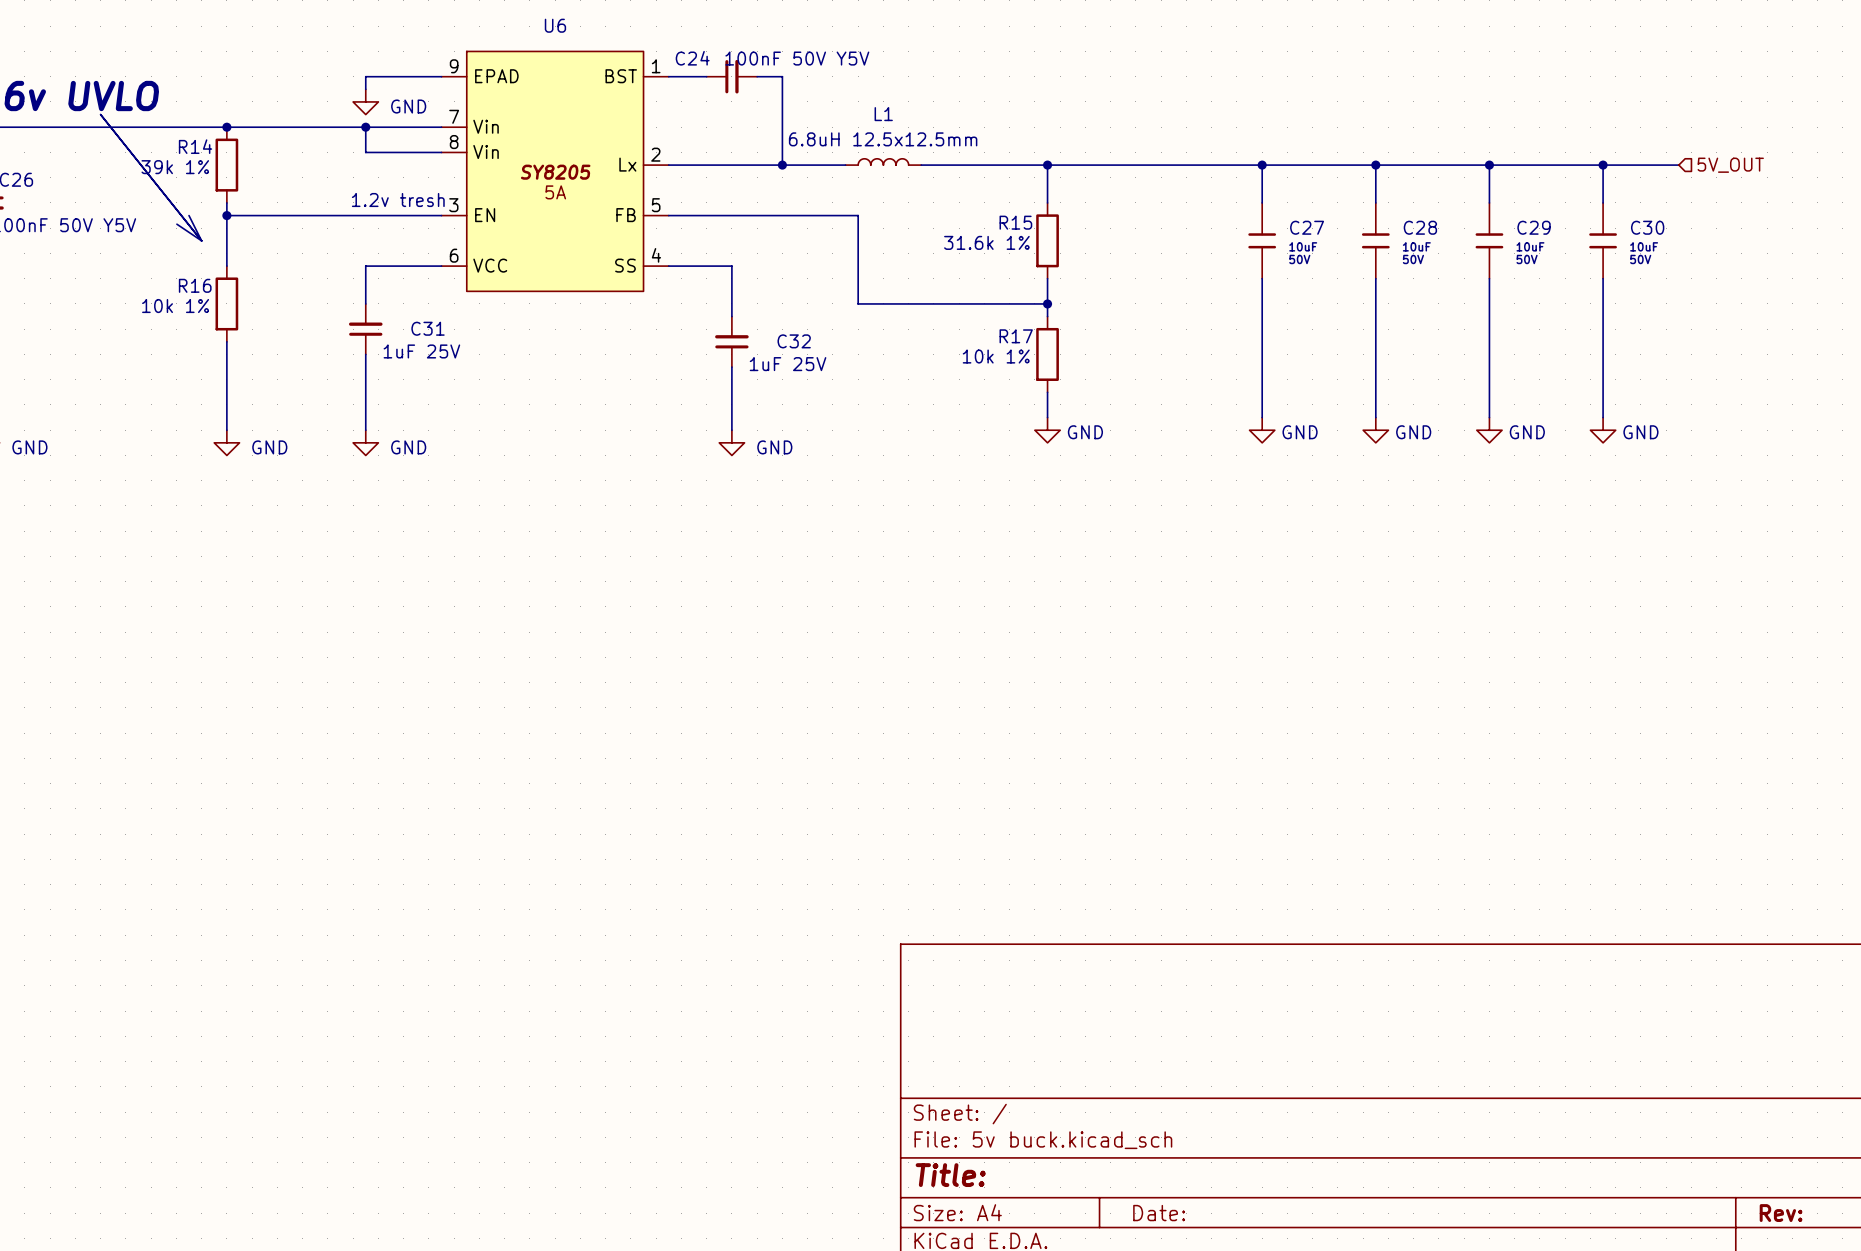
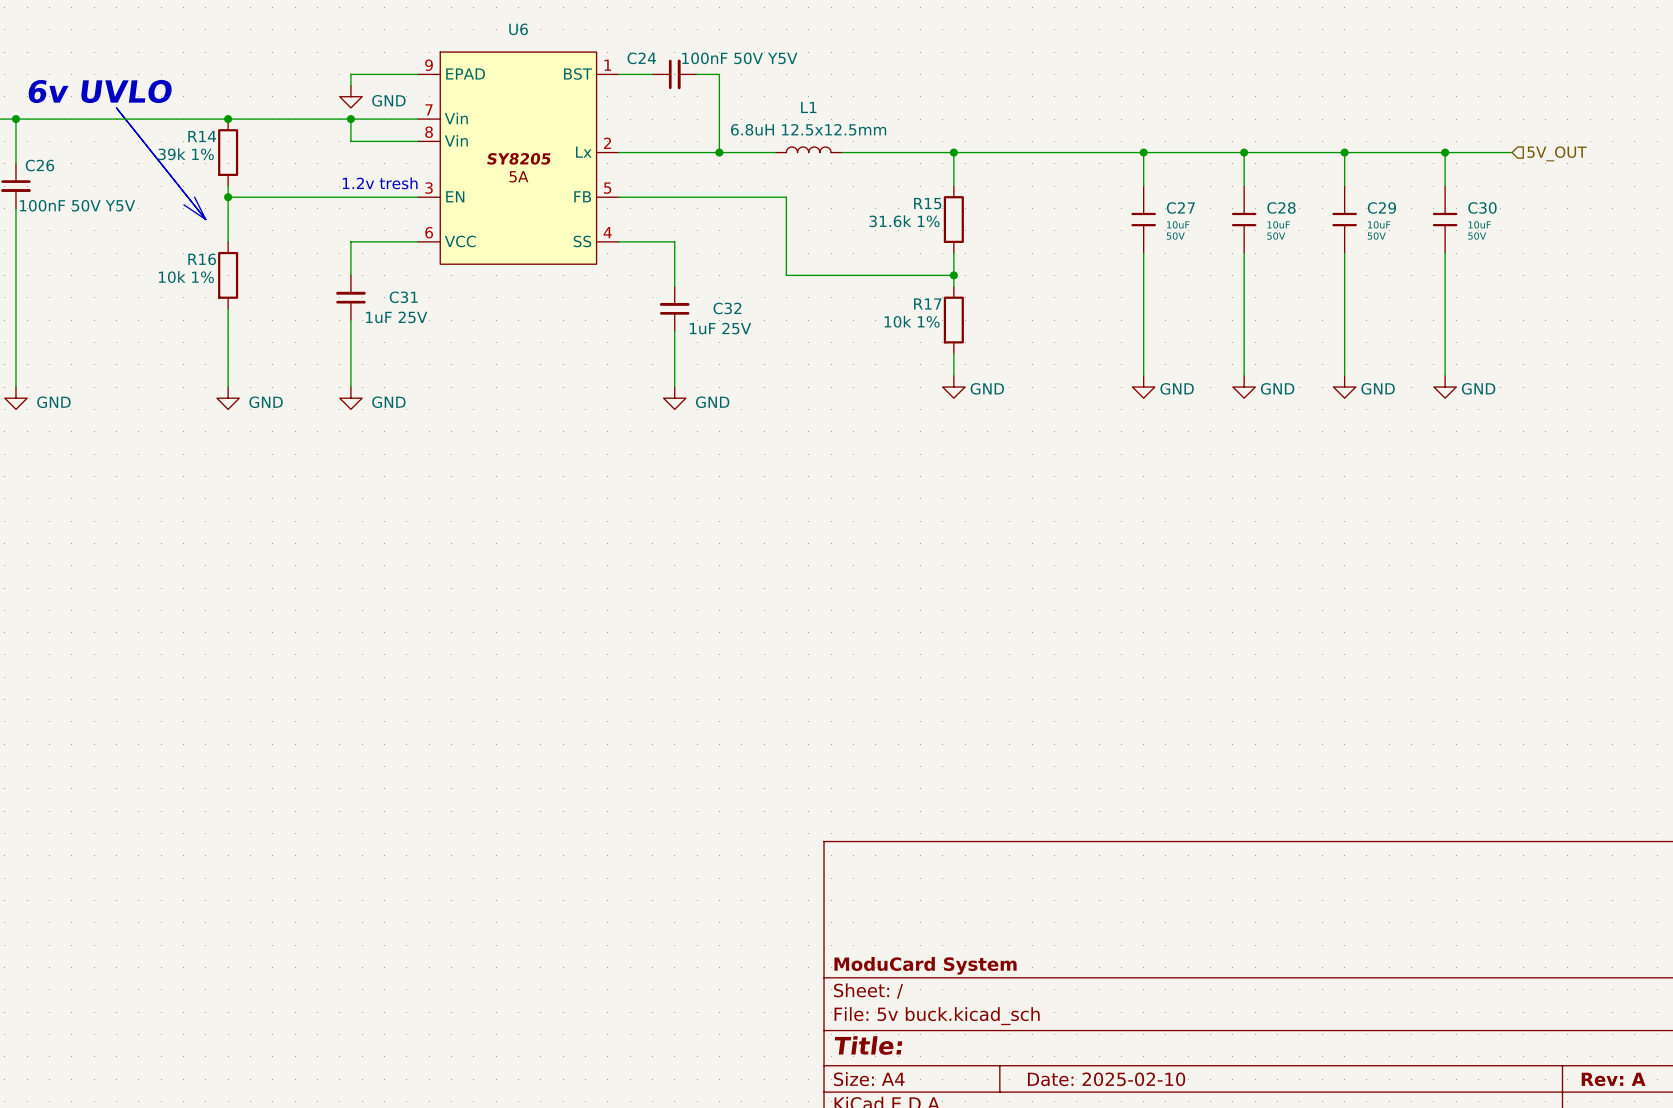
title block: none -> ModuCard System (925, 965)
title block: Date: (1159, 1213) -> Date: 2025-02-10 (1106, 1079)
title block: Rev: (1781, 1213) -> Rev: A (1613, 1079)

